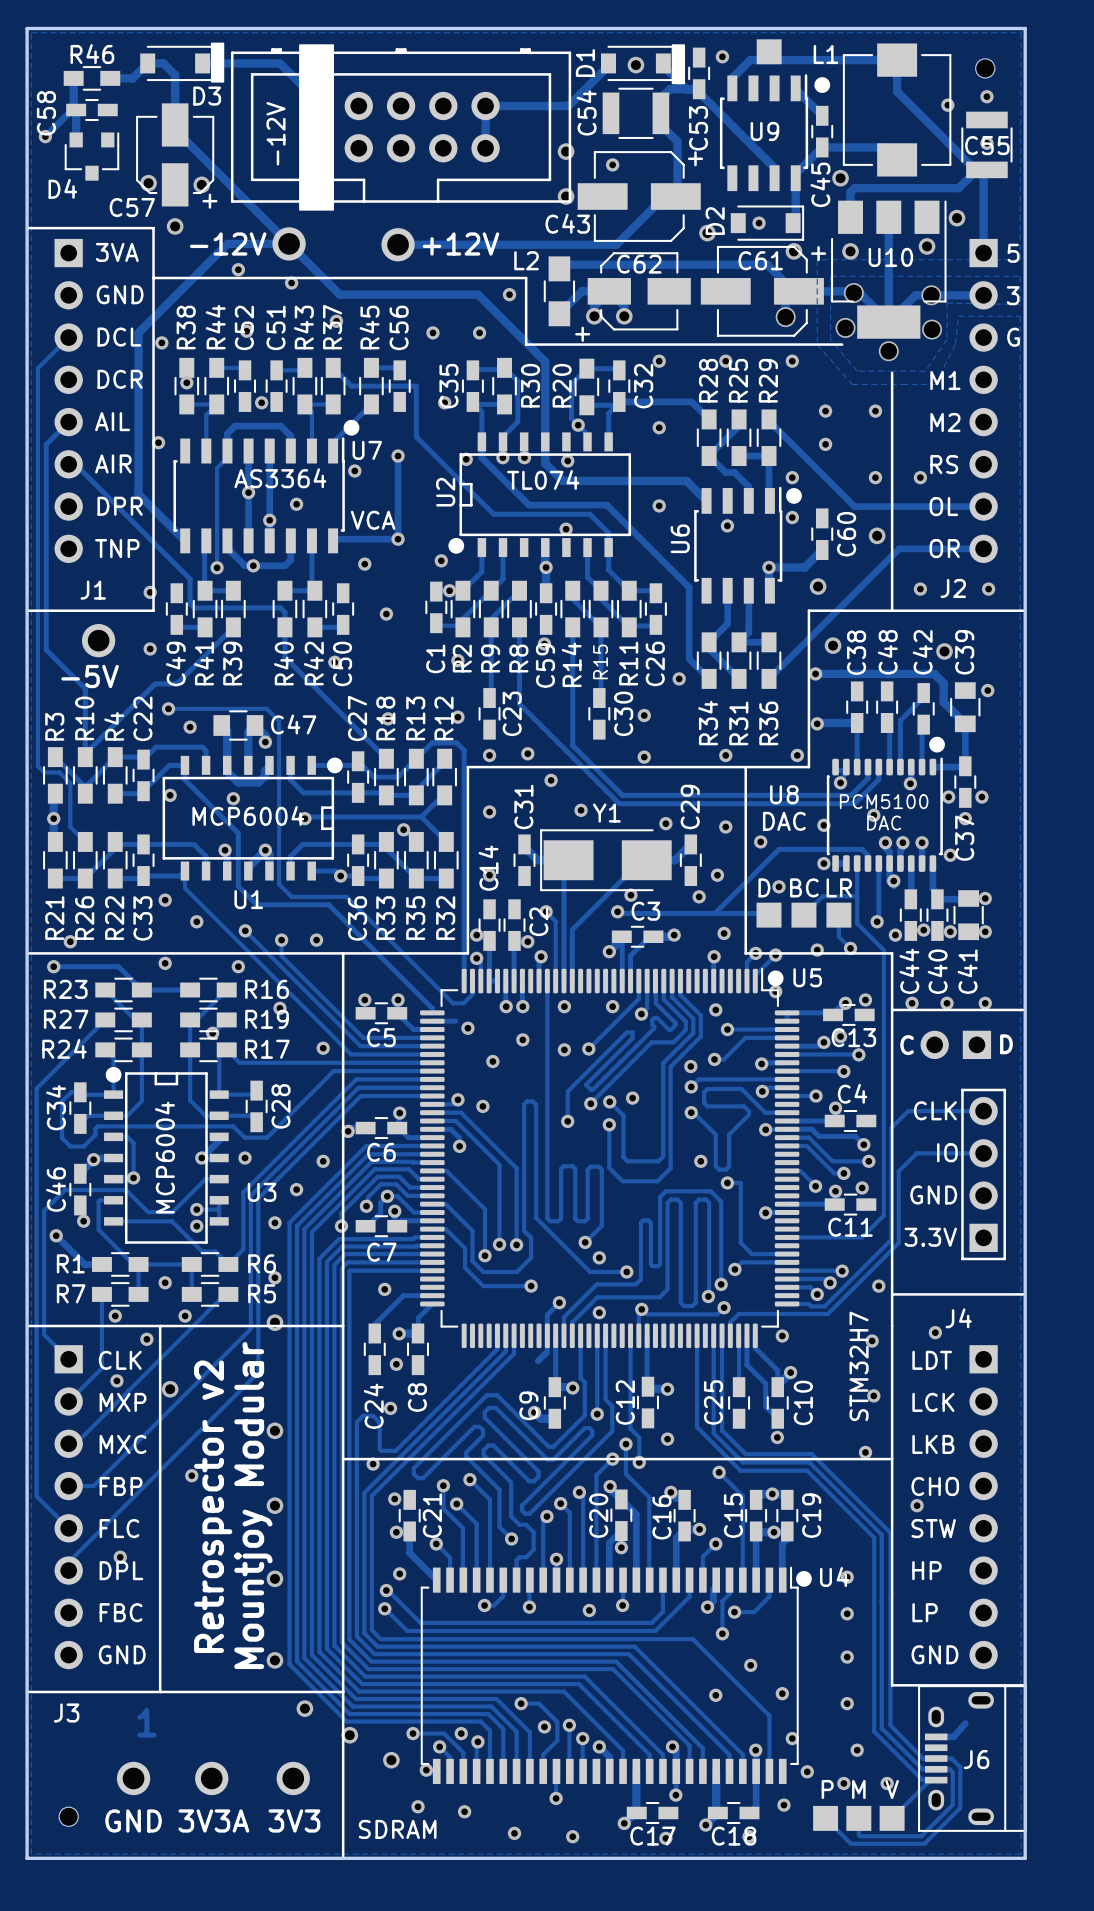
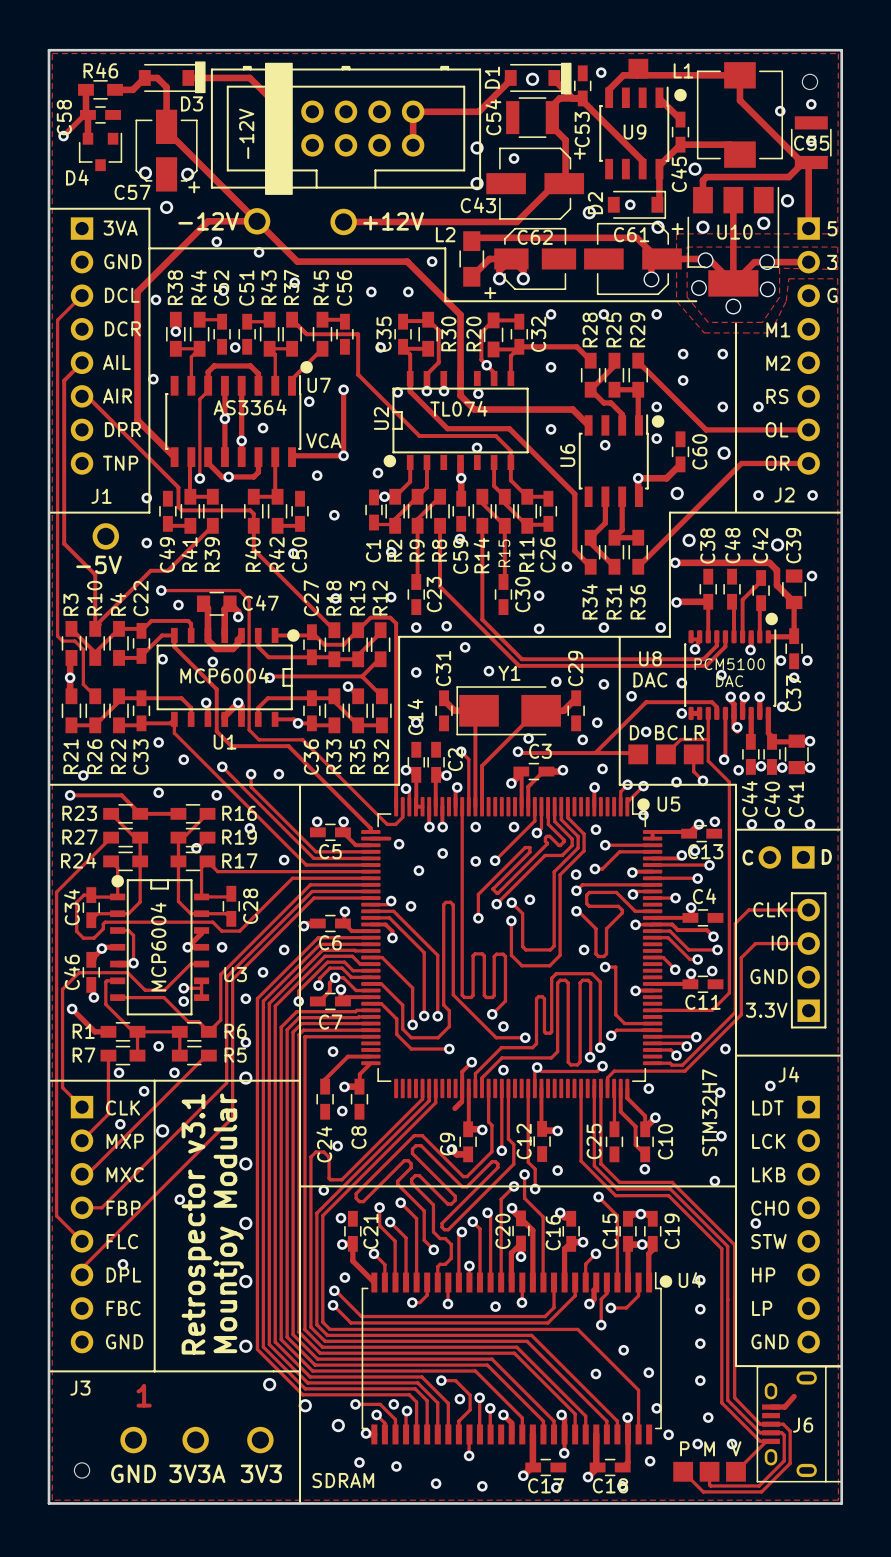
text: Retrospector v2 (213, 1506) -> Retrospector v3.1 (196, 1224)

